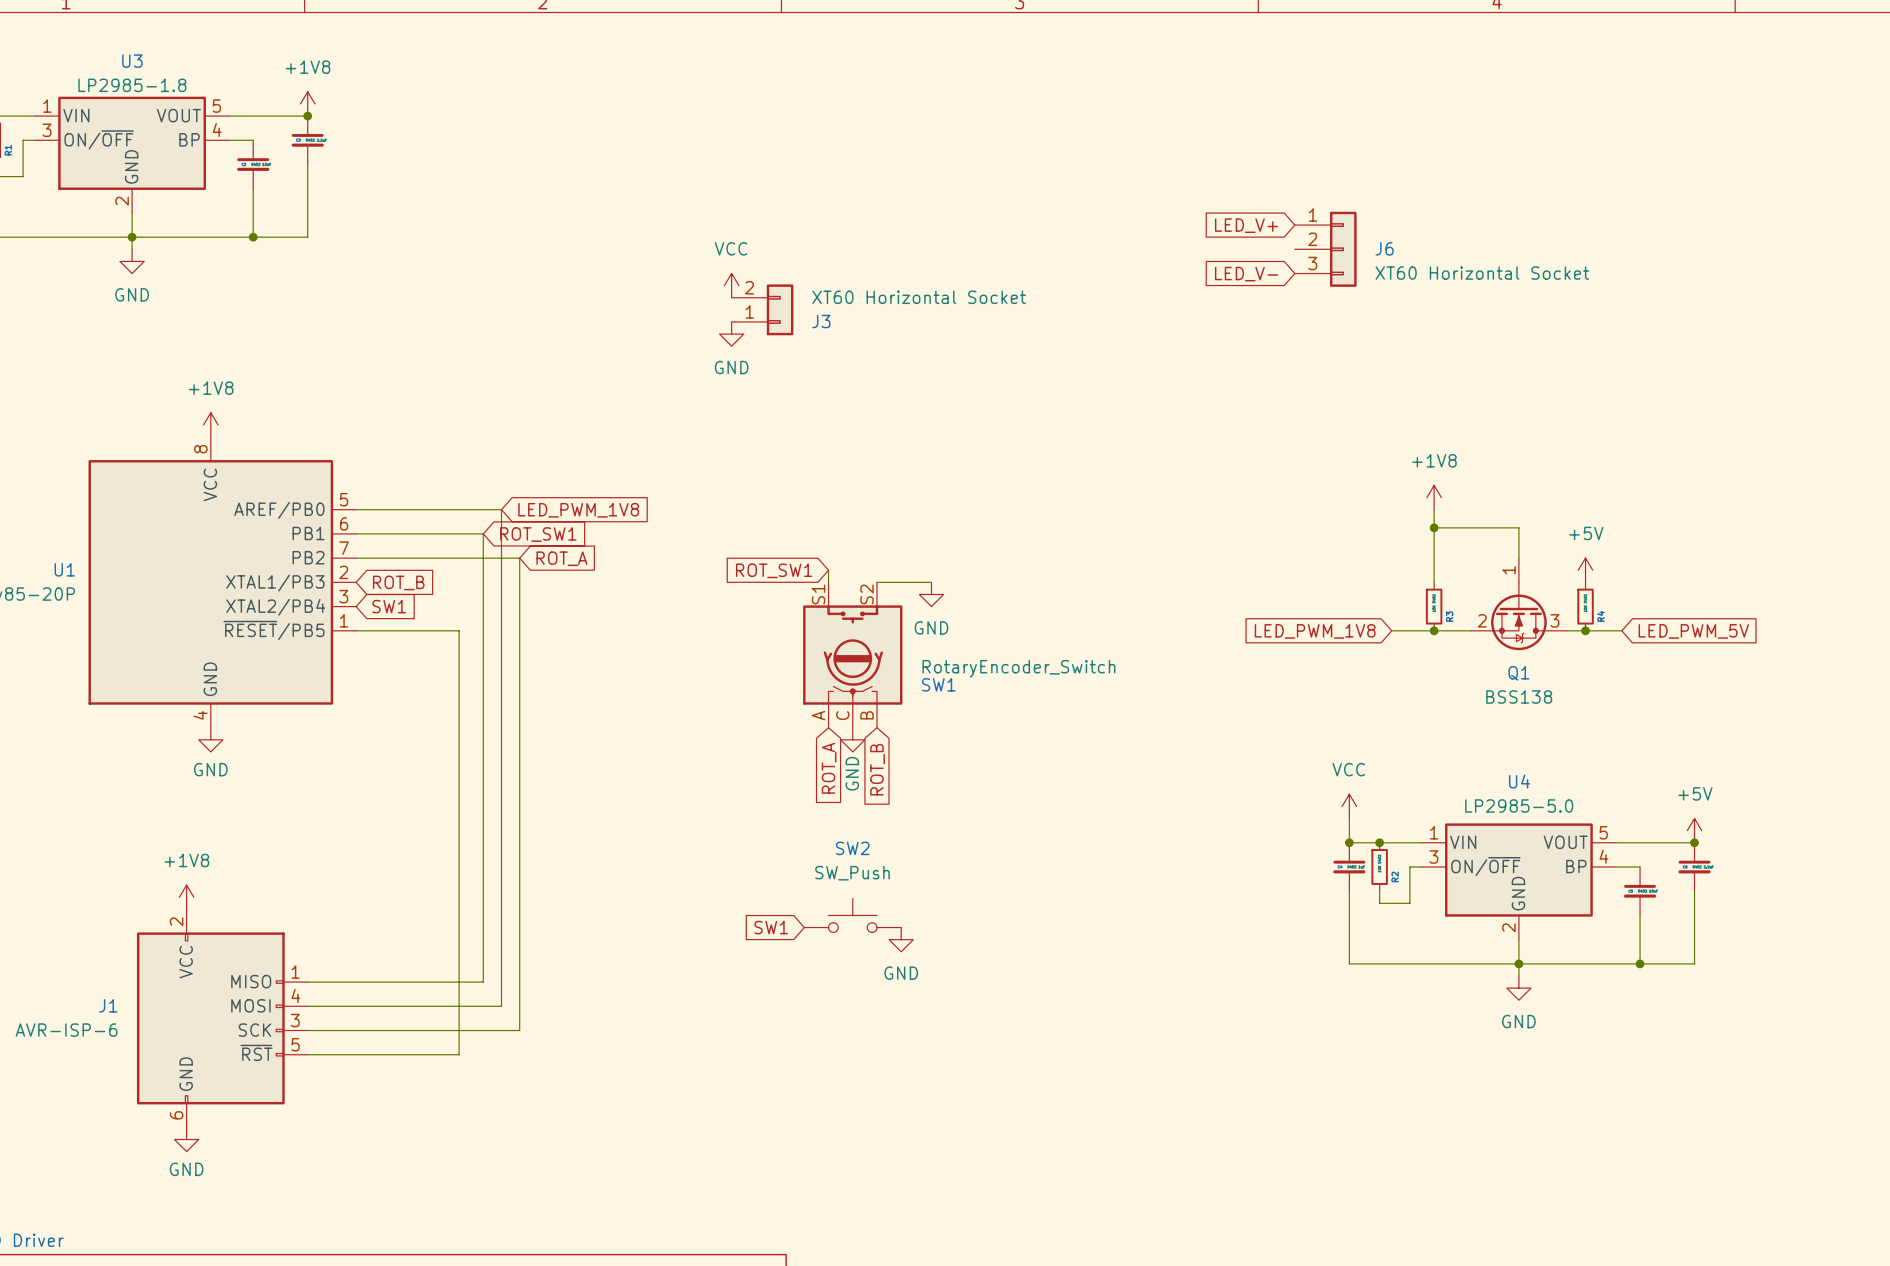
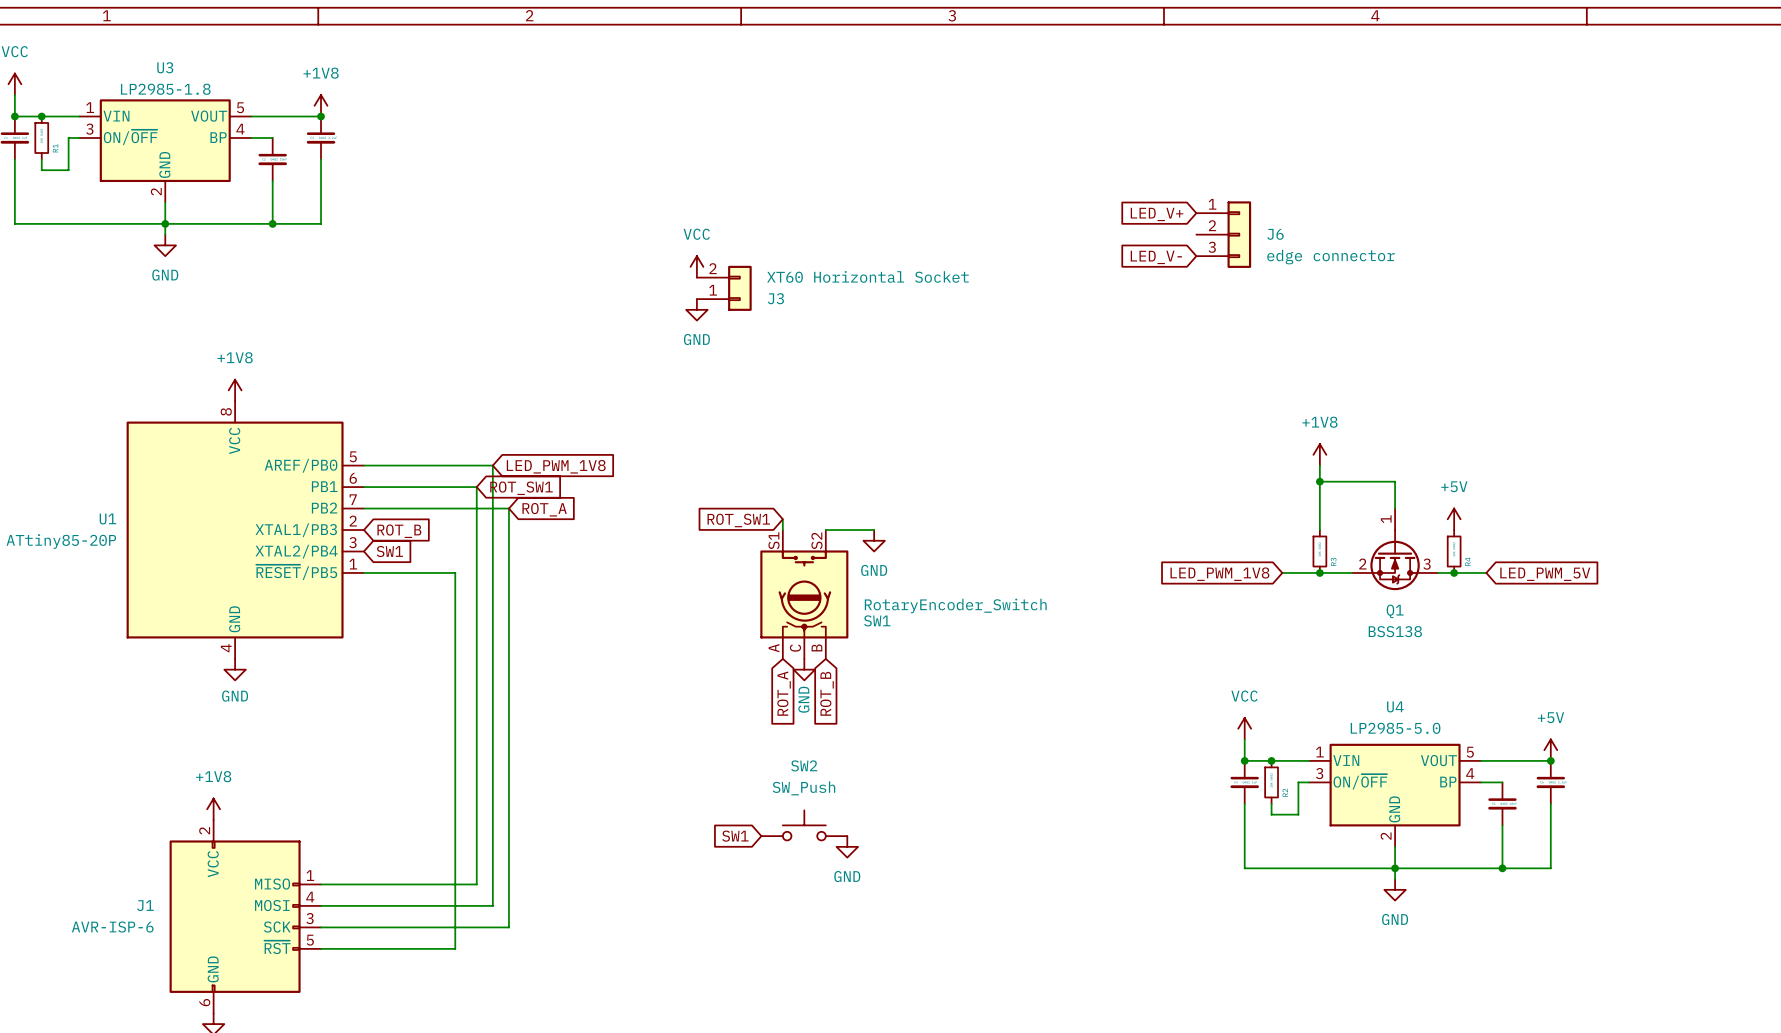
J6 value: XT60 Horizontal Socket (1482, 273) -> edge connector (1331, 257)

